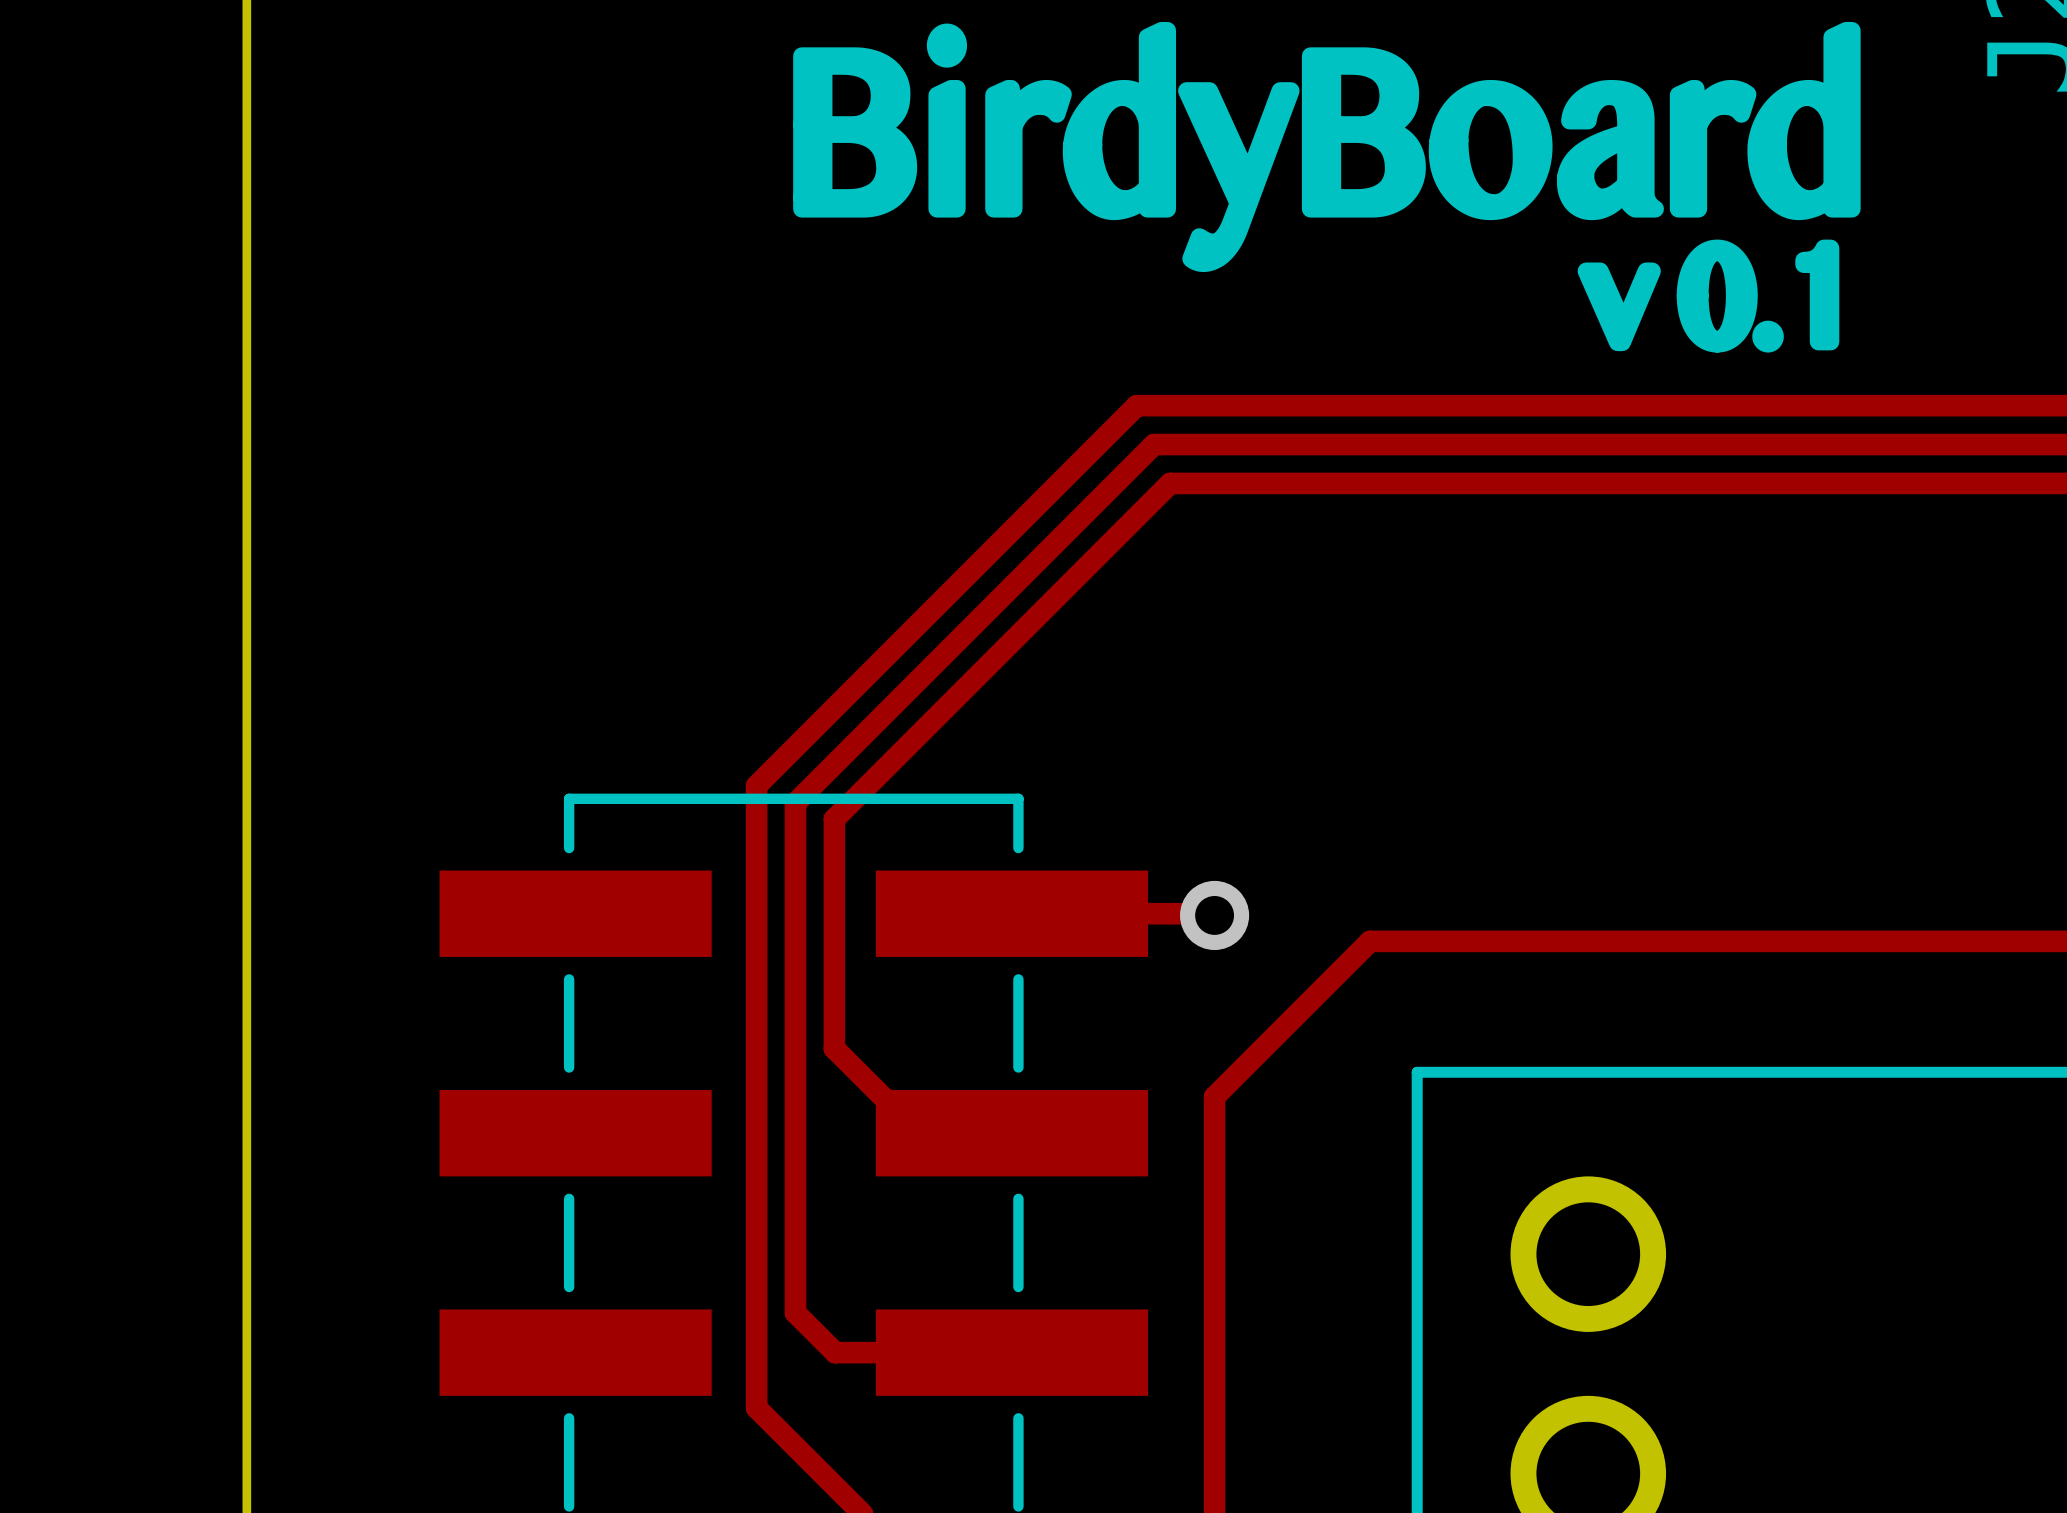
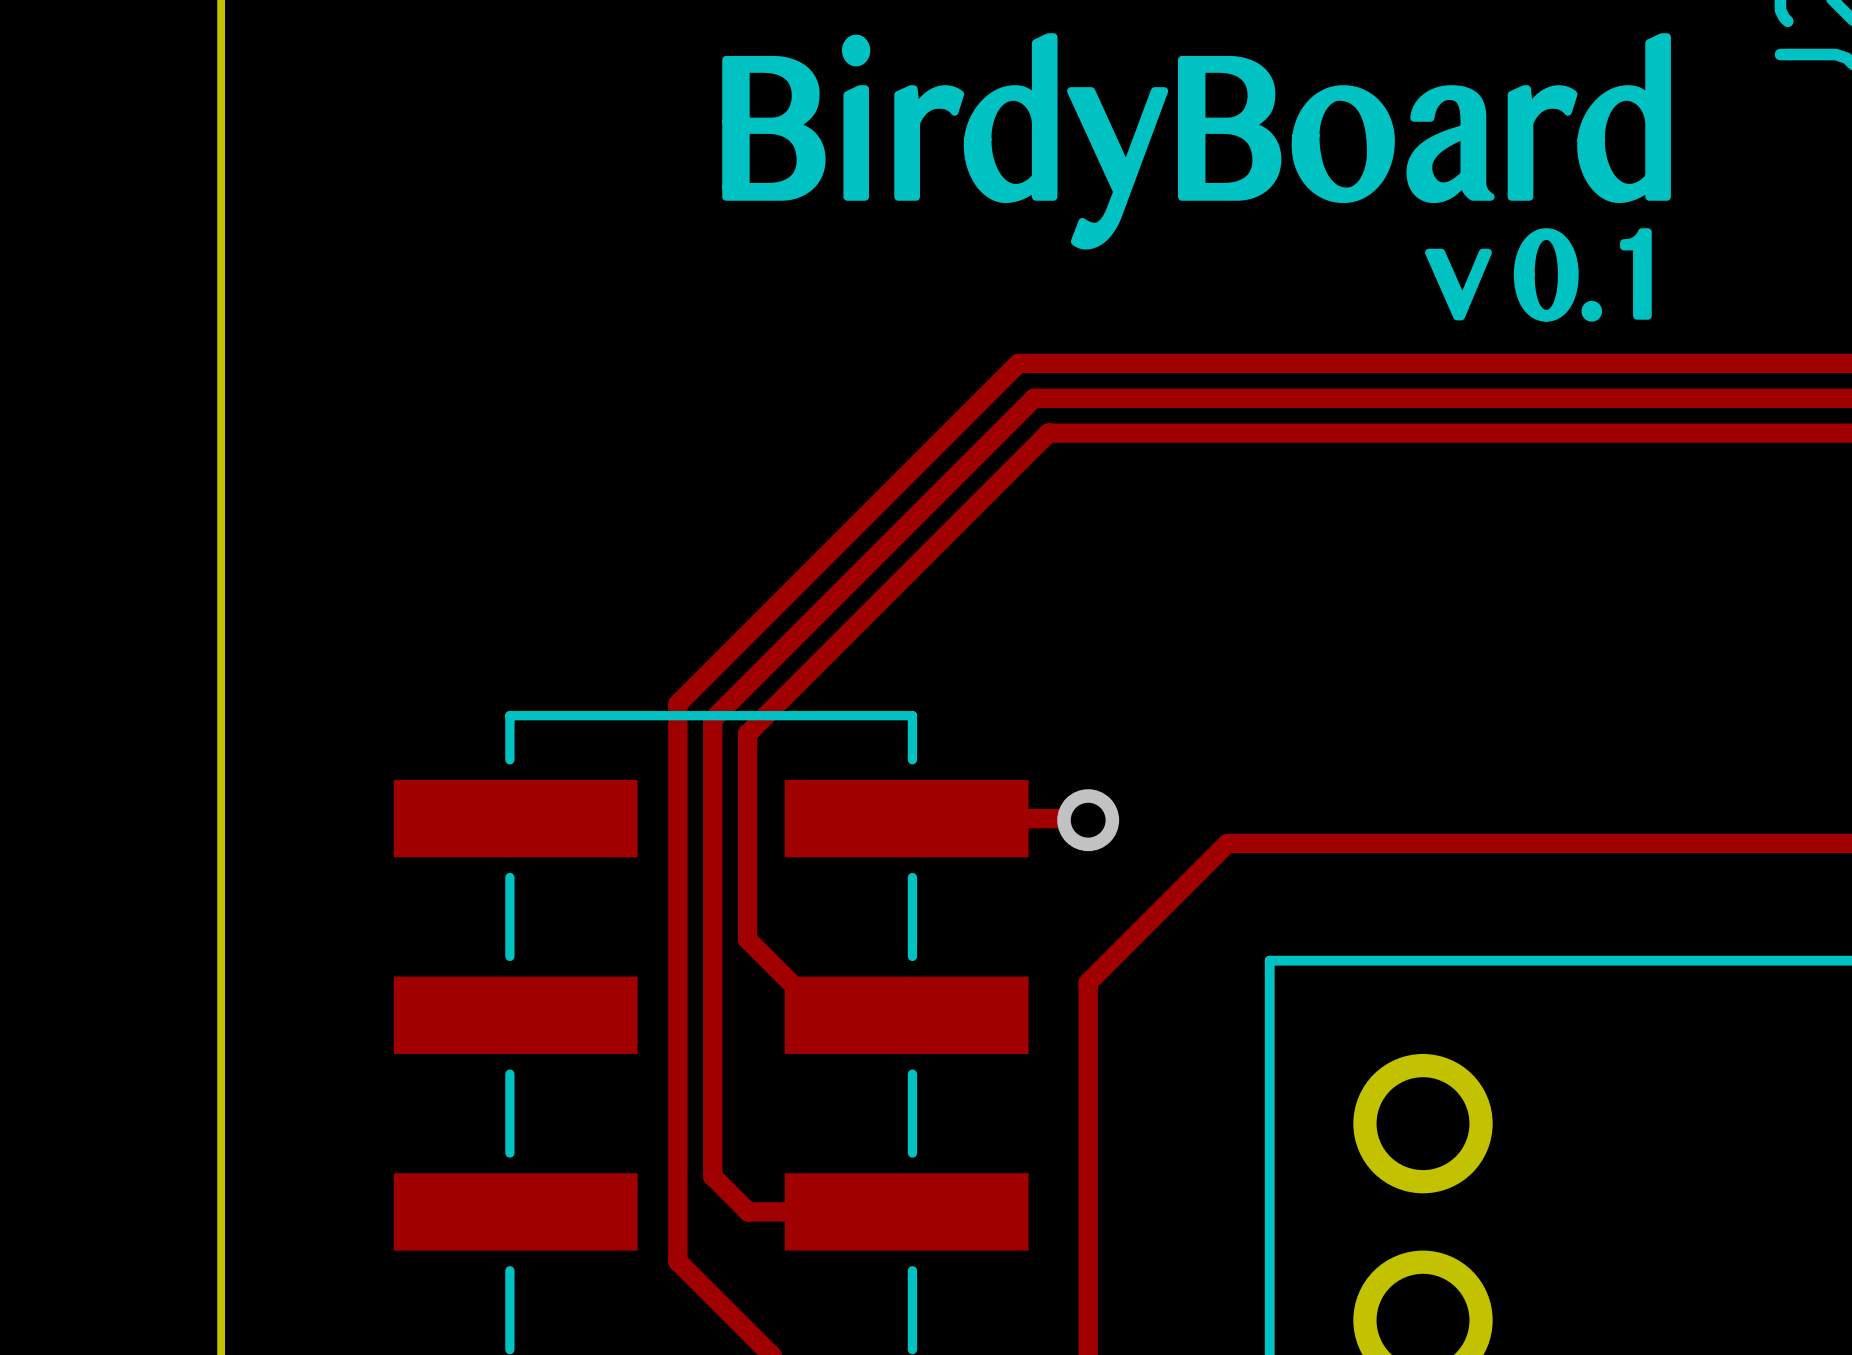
drawing shape: [1062, 21, 1177, 221] -> [963, 33, 1058, 204]
drawing shape: [1747, 21, 1861, 221] -> [1577, 33, 1671, 204]
drawing shape: [926, 23, 968, 68] -> [842, 34, 871, 67]
drawing shape: [793, 47, 918, 218] -> [722, 55, 826, 201]
drawing shape: [1301, 47, 1426, 218] -> [1178, 55, 1282, 201]
drawing shape: [928, 79, 966, 218] -> [843, 85, 870, 201]
drawing shape: [985, 79, 1072, 218] -> [894, 85, 965, 201]
drawing shape: [1428, 79, 1553, 221] -> [1291, 85, 1395, 204]
drawing shape: [1556, 79, 1664, 221] -> [1406, 85, 1495, 204]
drawing shape: [1669, 79, 1757, 218] -> [1507, 85, 1578, 201]
drawing shape: [1178, 82, 1300, 273] -> [1067, 87, 1169, 250]
drawing shape: [1676, 239, 1758, 353] -> [1513, 228, 1579, 322]
drawing shape: [1795, 239, 1840, 351] -> [1620, 228, 1652, 320]
drawing shape: [1577, 262, 1661, 352] -> [1425, 248, 1492, 321]
drawing shape: [1752, 320, 1784, 353] -> [1581, 300, 1603, 322]

